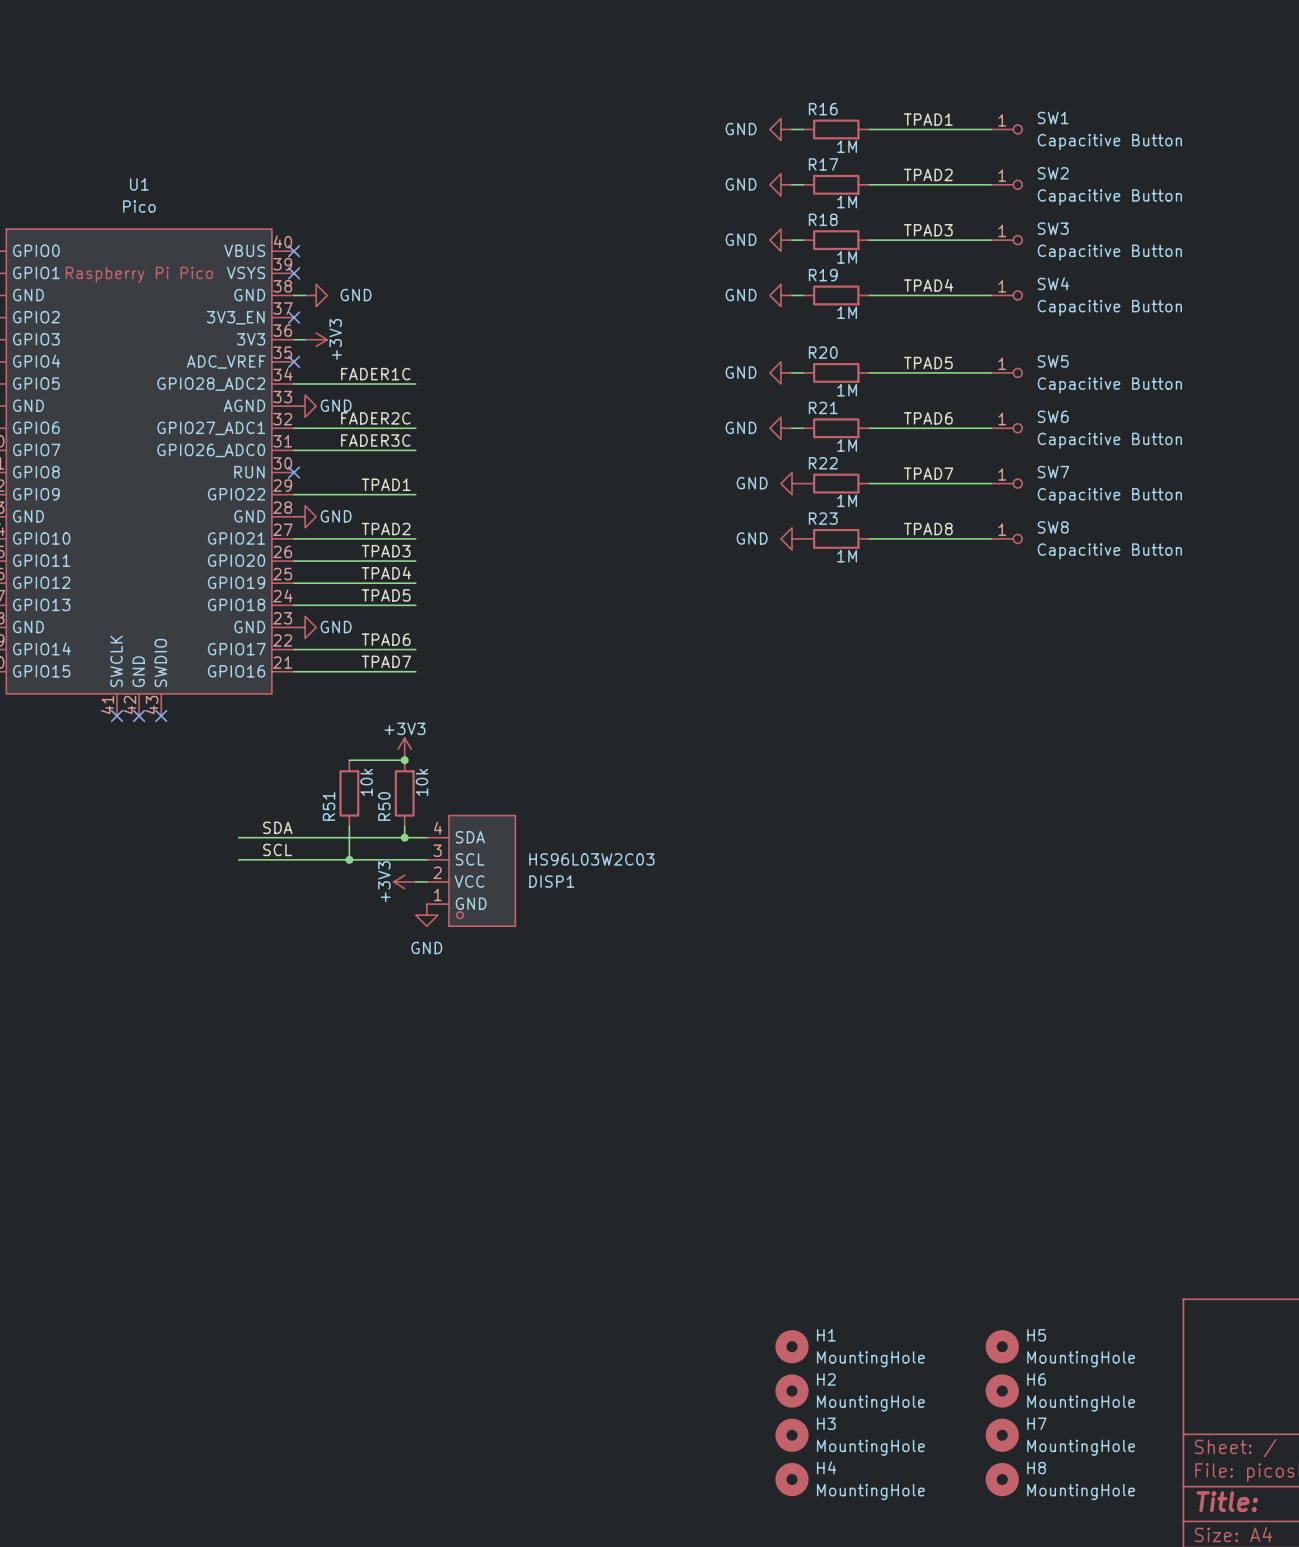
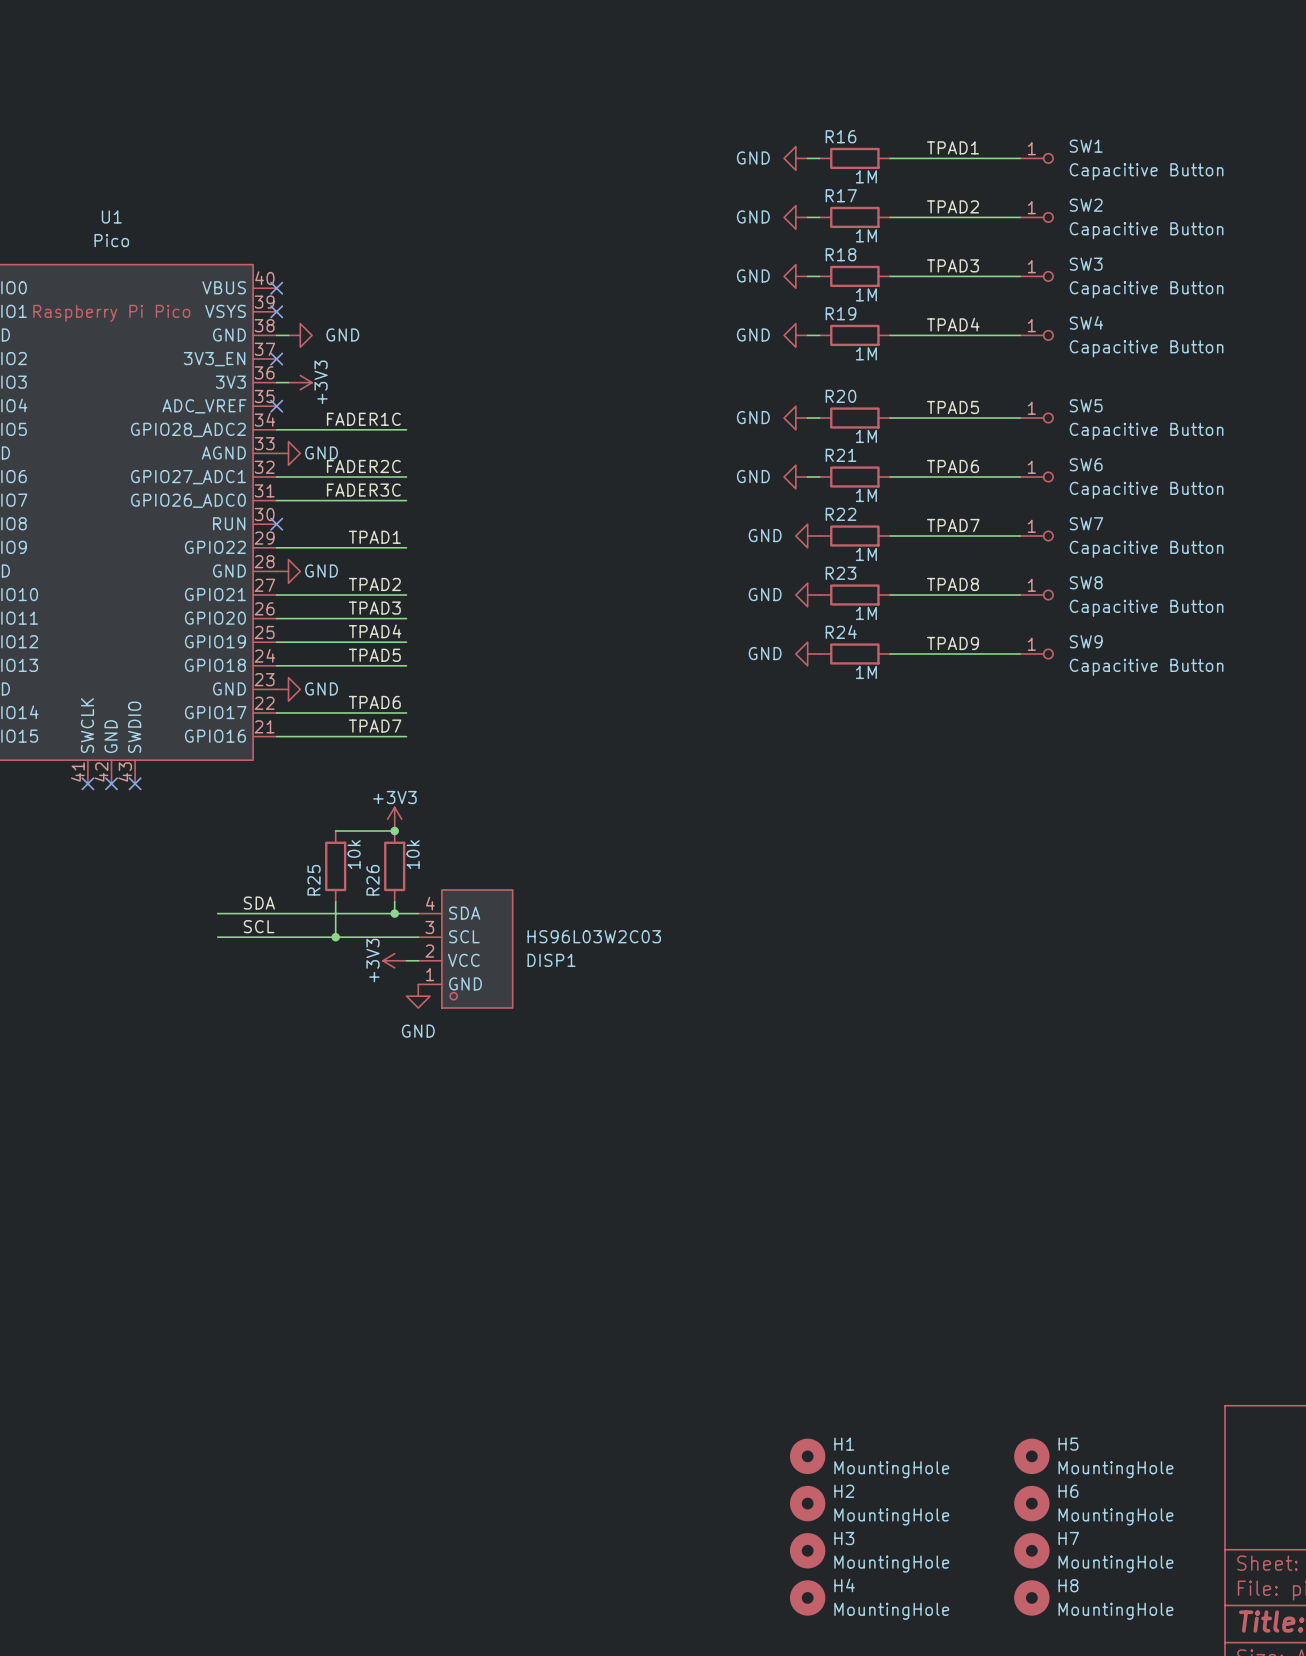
label: none -> TPAD9 (953, 643)
power symbol: none -> GND (807, 654)
R24: none -> 1M (854, 654)
wire: none -> (890, 654) (1020, 654)
SW9: none -> Capacitive Button (1036, 654)
R51 name: R51 (329, 806) -> R25 (314, 880)
R50 name: R50 (384, 806) -> R26 (373, 880)

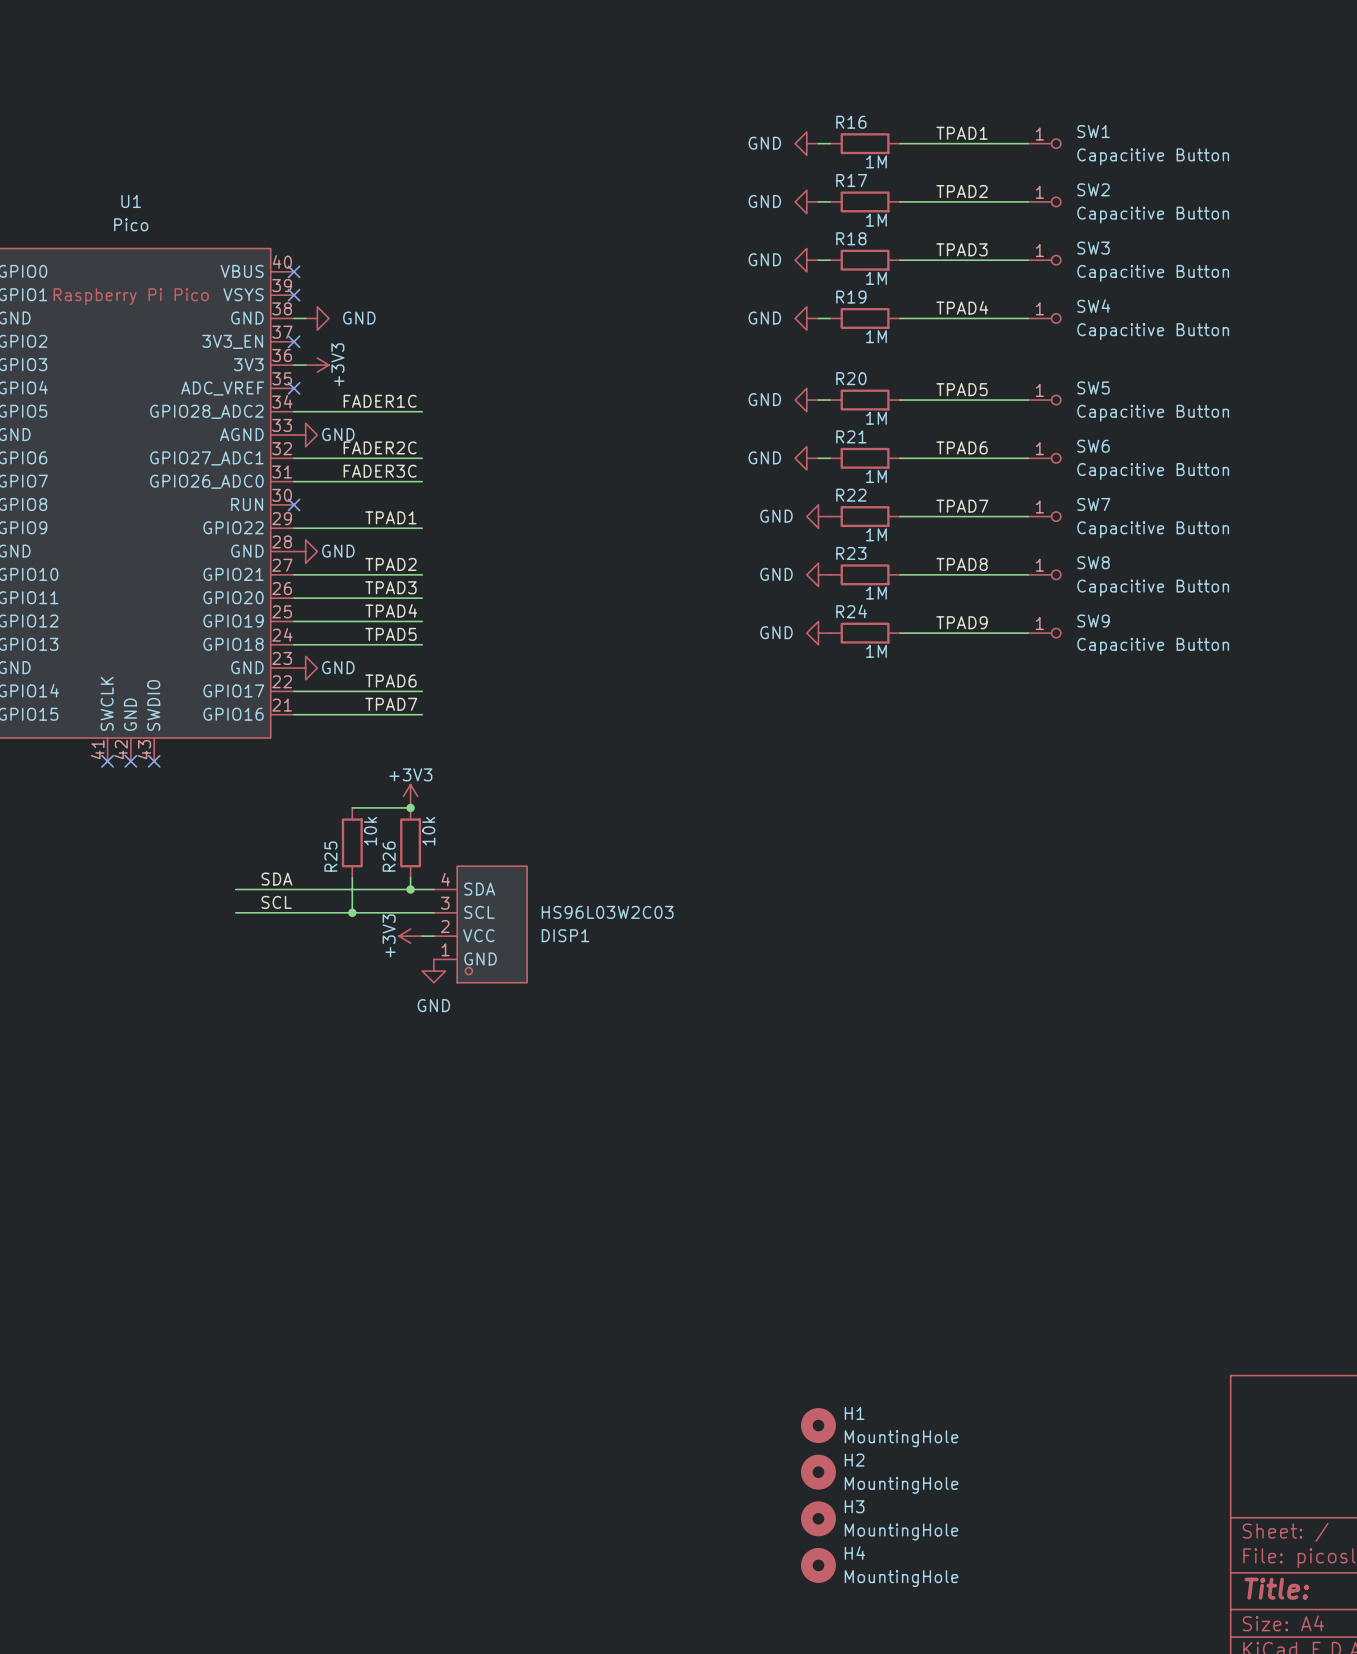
H5: MountingHole (1031, 1456) -> none
H6: MountingHole (1031, 1503) -> none
H7: MountingHole (1031, 1550) -> none
H8: MountingHole (1031, 1597) -> none

